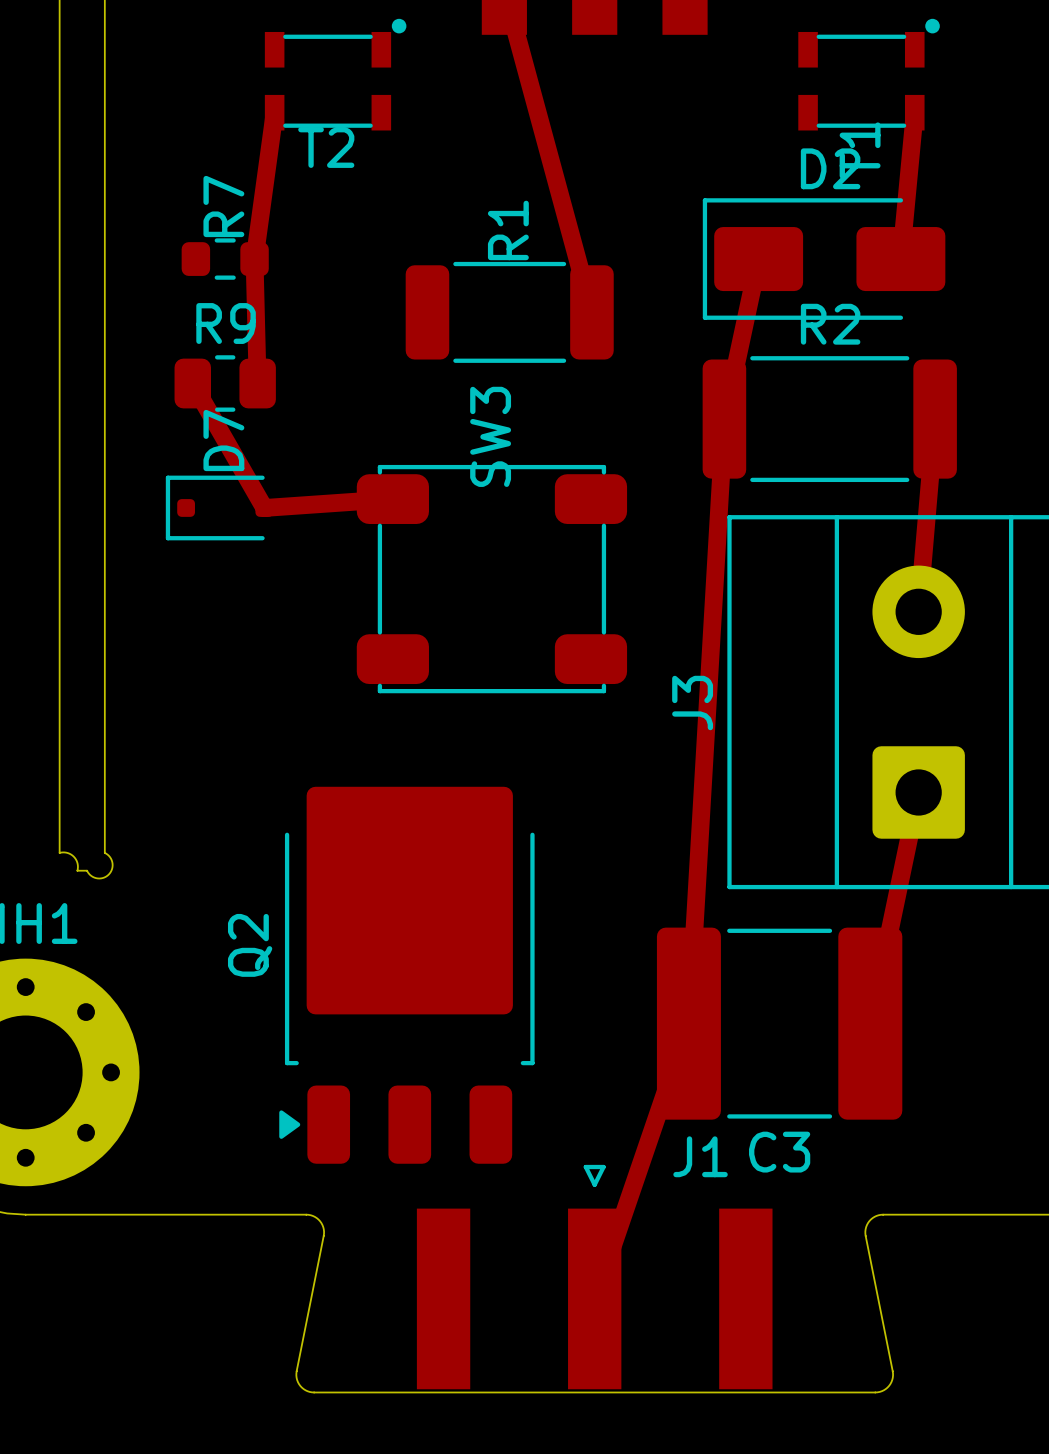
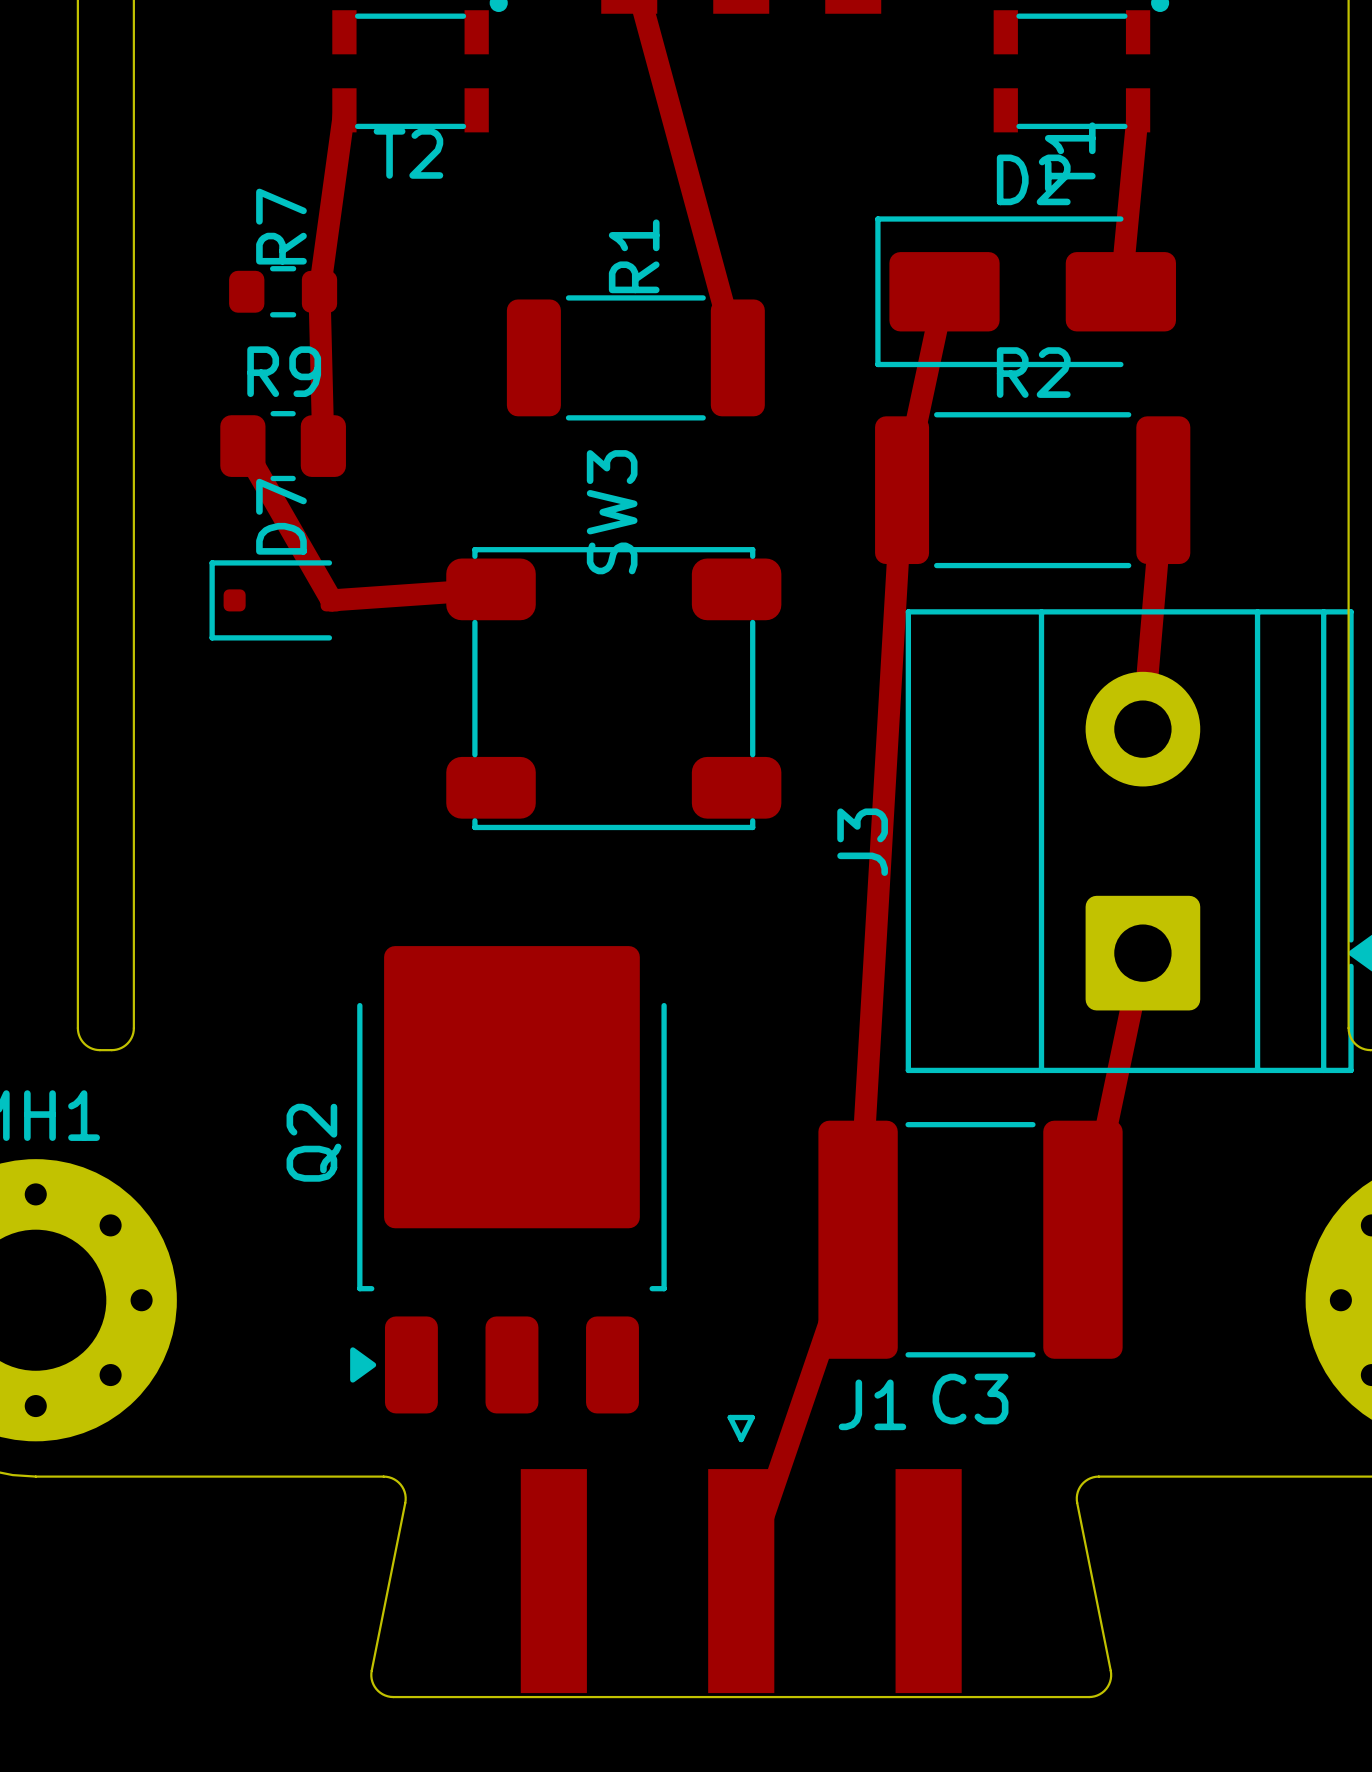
board edge: (59, 852) (67, 853) (73, 856) (77, 862) (77, 870) -> (77, 1028) (79, 1035) (84, 1043) (92, 1048) (99, 1050)
board edge: (104, 852) (112, 861) (112, 868) (108, 874) (97, 878) (91, 875) (87, 870) -> (133, 1028) (131, 1037) (127, 1043) (121, 1047) (111, 1050)

